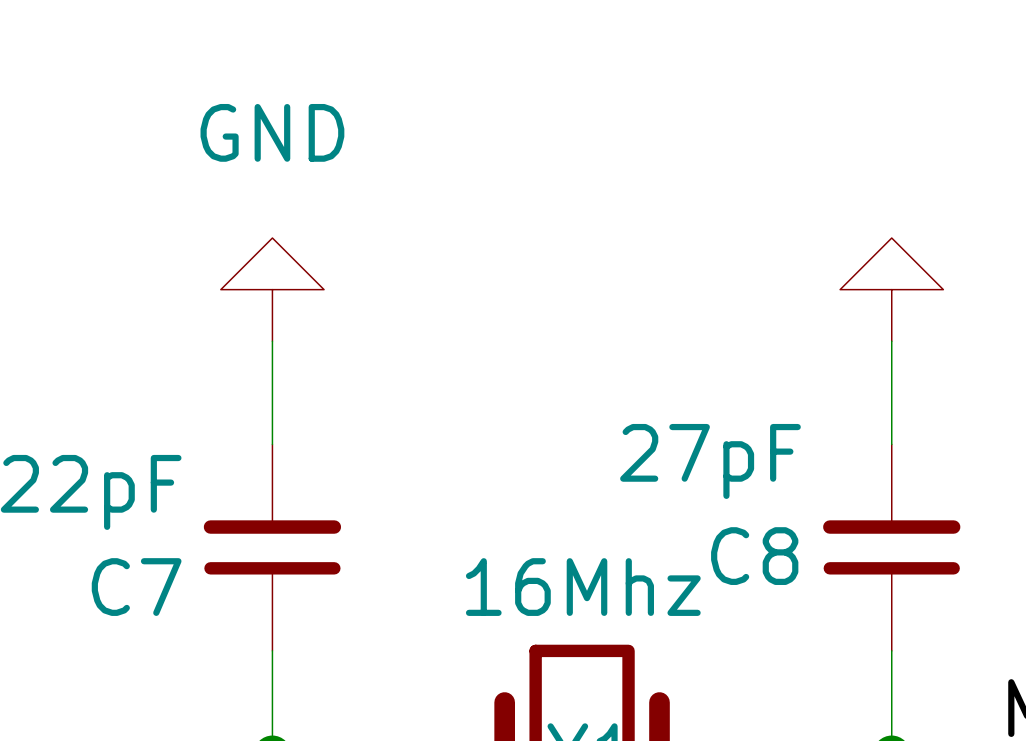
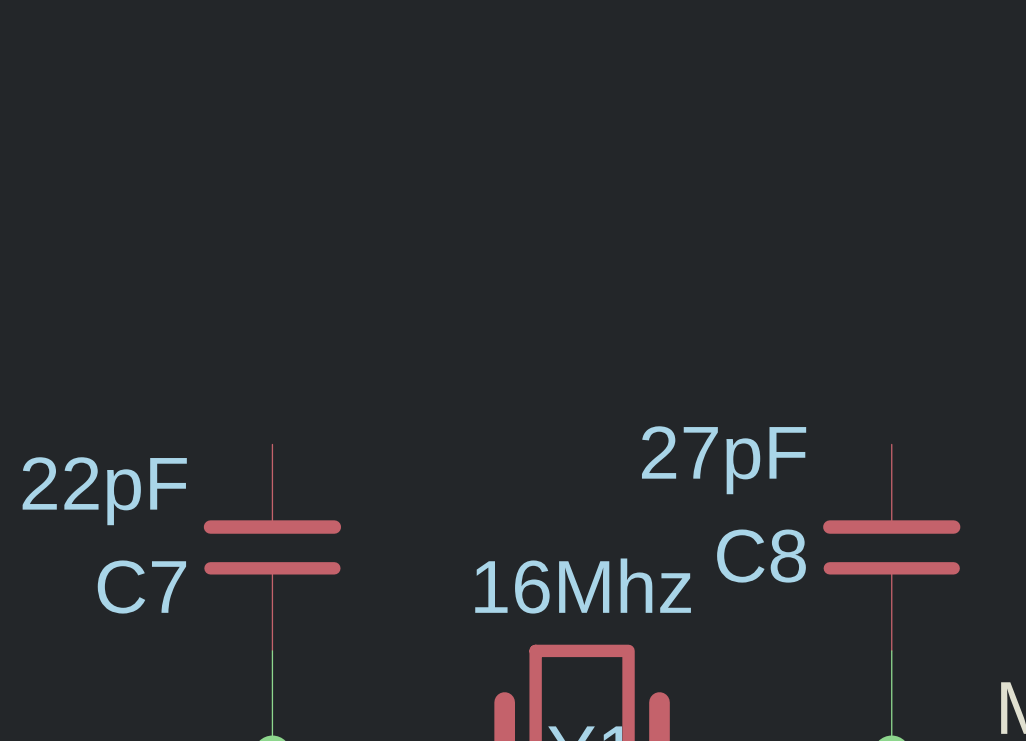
power symbol: GND (272, 289) -> none
power symbol: (891, 289) -> none
wire: (272, 341) (272, 444) -> none
wire: (891, 341) (891, 444) -> none

